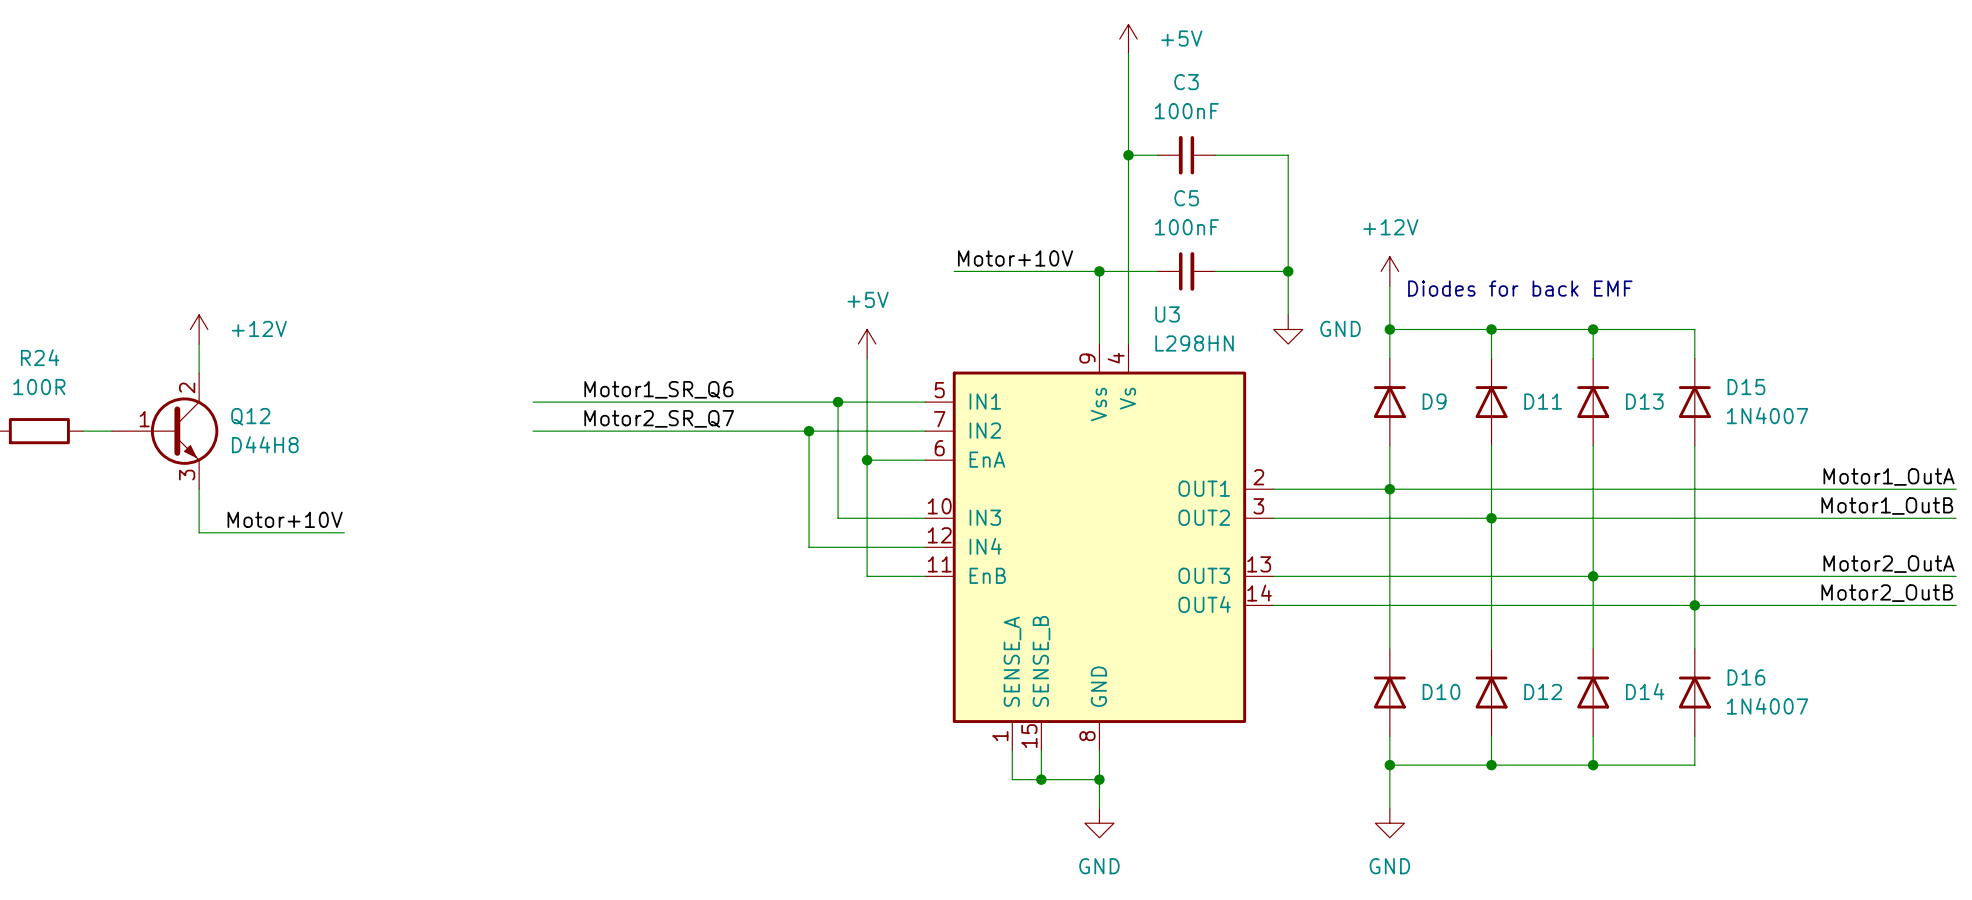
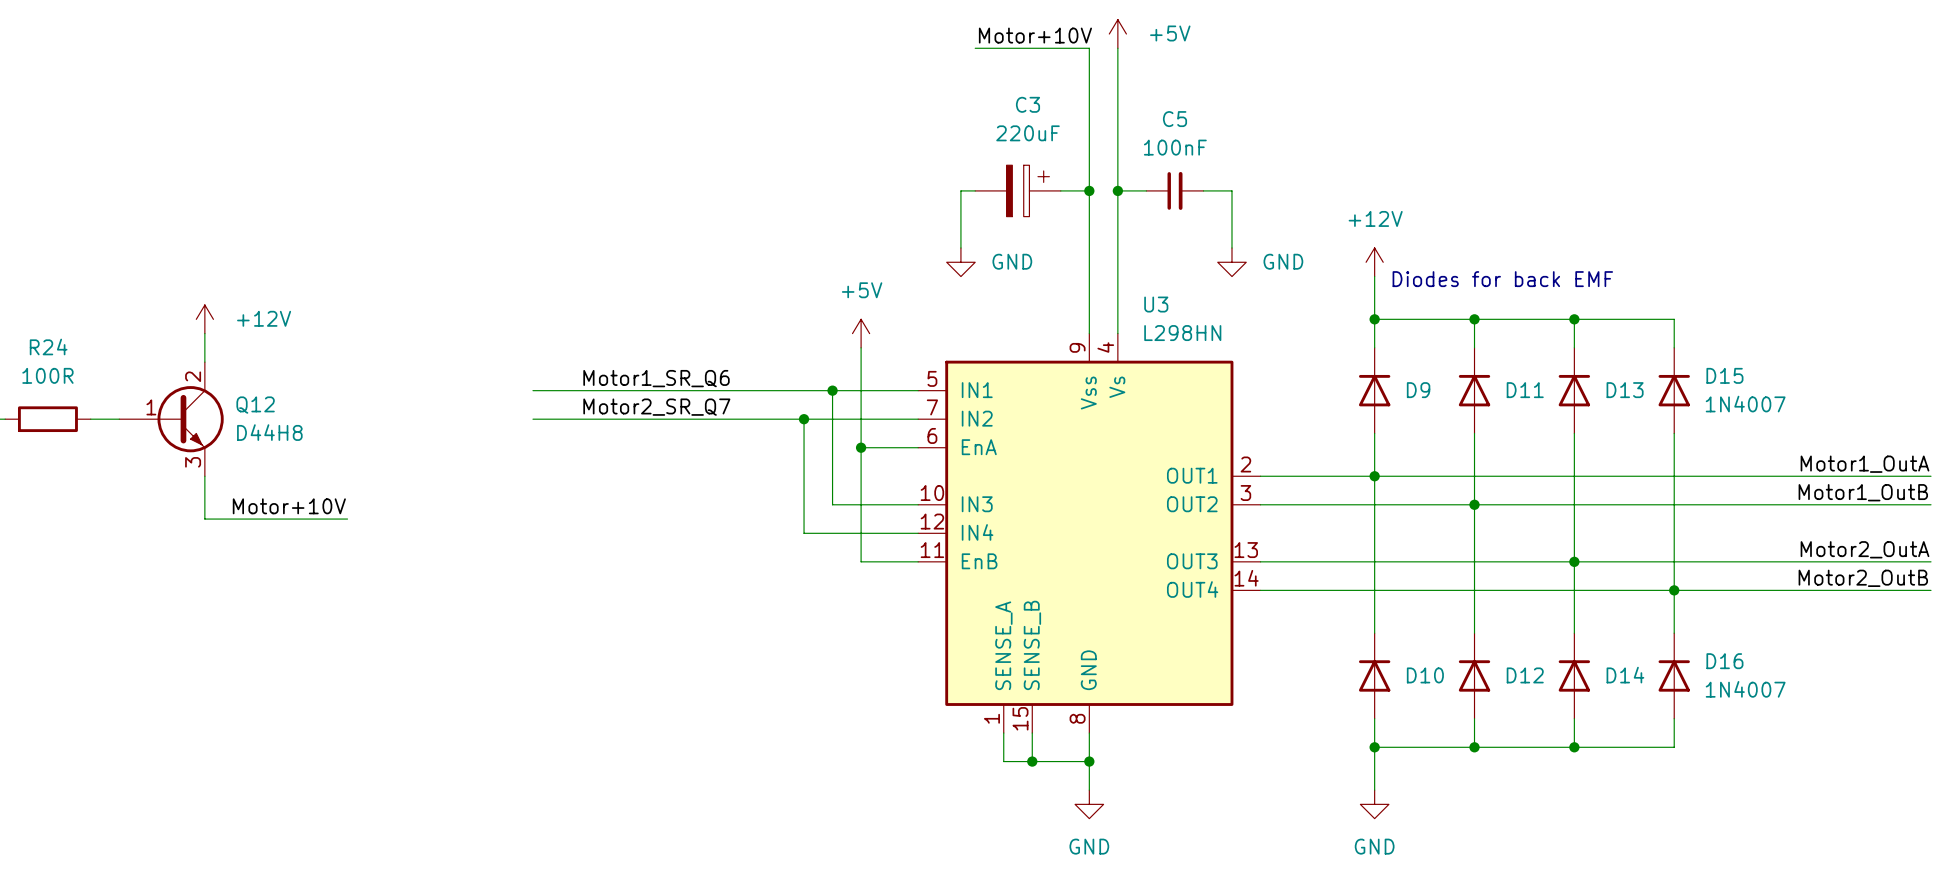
wire: none -> (975, 48) (1089, 48) (1089, 262)
C3 value: 100nF (1186, 111) -> 220uF (1027, 133)
C3 symbol: [1157, 135, 1216, 175] -> [975, 165, 1061, 217]
wire: (1128, 155) (1157, 155) -> (1117, 190) (1146, 190)
junction: (1128, 155) -> none
wire: (1215, 155) (1288, 155) (1288, 314) -> none
wire: none -> (975, 190) (960, 190) (960, 248)
wire: none -> (1060, 190) (1089, 190)
junction: none -> (1089, 190)
junction: none -> (1117, 190)
wire: none -> (1203, 190) (1231, 190) (1231, 248)
label position: Motor+10V (1015, 258) -> Motor+10V (1035, 35)
wire: (954, 271) (1157, 271) -> none
power symbol: none -> GND (960, 262)
junction: (1099, 271) -> none
C5 position: (1186, 271) -> (1174, 190)
wire: (1215, 271) (1288, 271) -> none
junction: (1288, 271) -> none
power symbol position: GND (1288, 329) -> GND (1231, 262)

